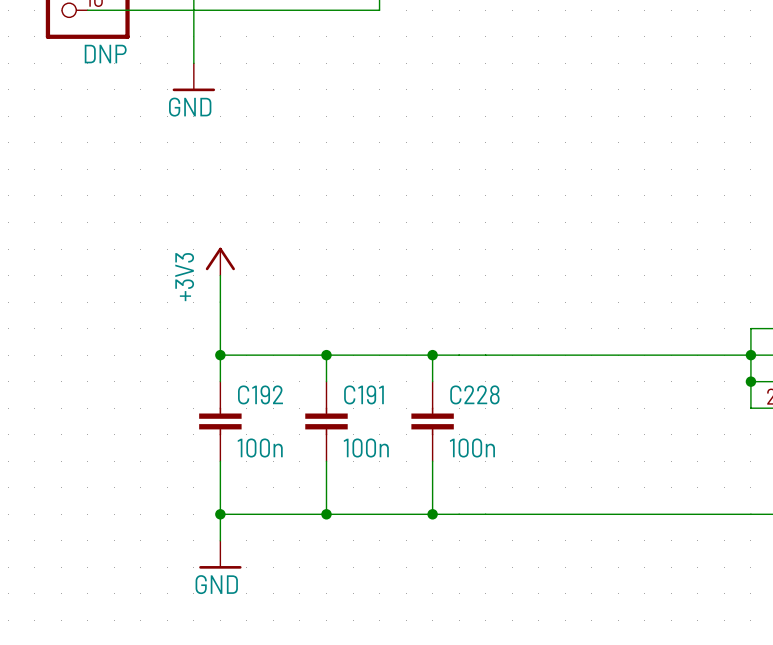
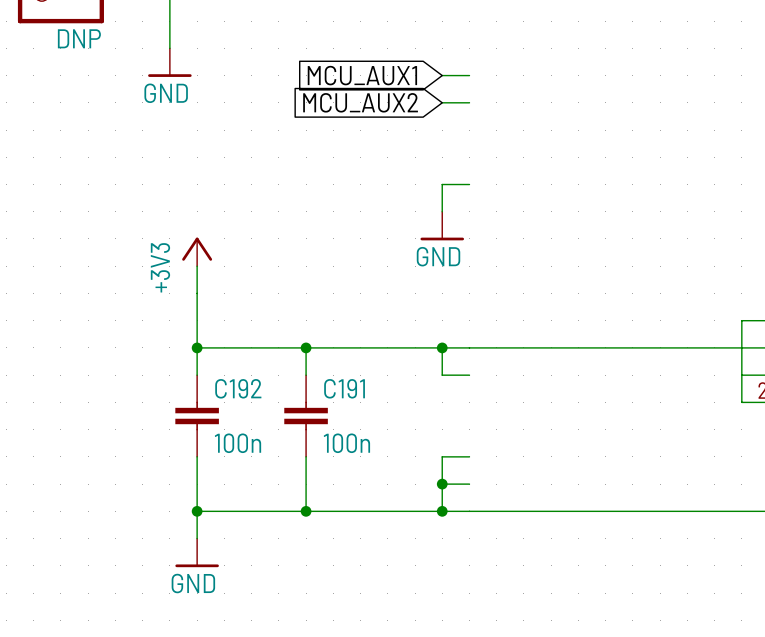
global label: none -> MCU_AUX1 (362, 75)
wire: none -> (442, 75) (469, 75)
global label: none -> MCU_AUX2 (360, 102)
wire: none -> (442, 102) (469, 102)
wire: none -> (469, 184) (442, 184) (442, 211)
power symbol: none -> GND (442, 226)
wire: (432, 355) (432, 381) -> none
junction position: (432, 355) -> (442, 347)
wire: none -> (442, 347) (442, 375) (469, 375)
junction: (750, 355) -> none
junction: (750, 381) -> none
C228: 100n (432, 421) -> none
wire: (432, 461) (432, 514) -> none
wire: none -> (469, 456) (442, 456) (442, 511)
wire: none -> (442, 484) (469, 484)
junction: none -> (442, 484)
junction: (432, 514) -> none
junction: none -> (442, 511)

